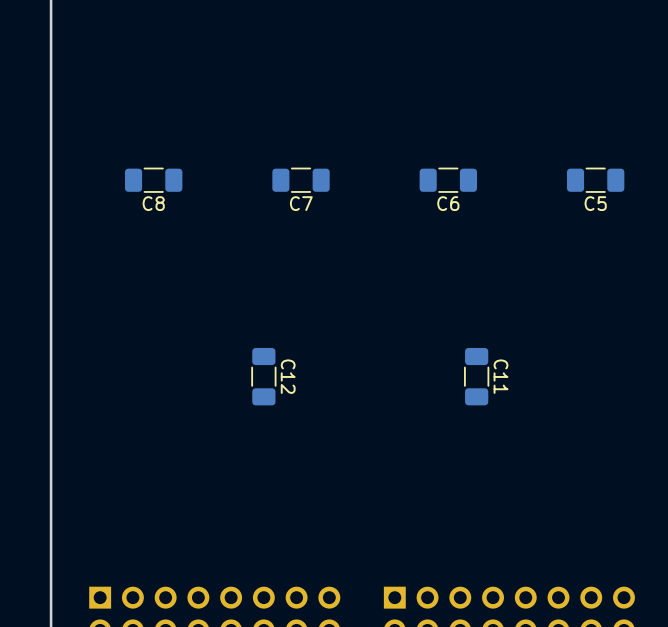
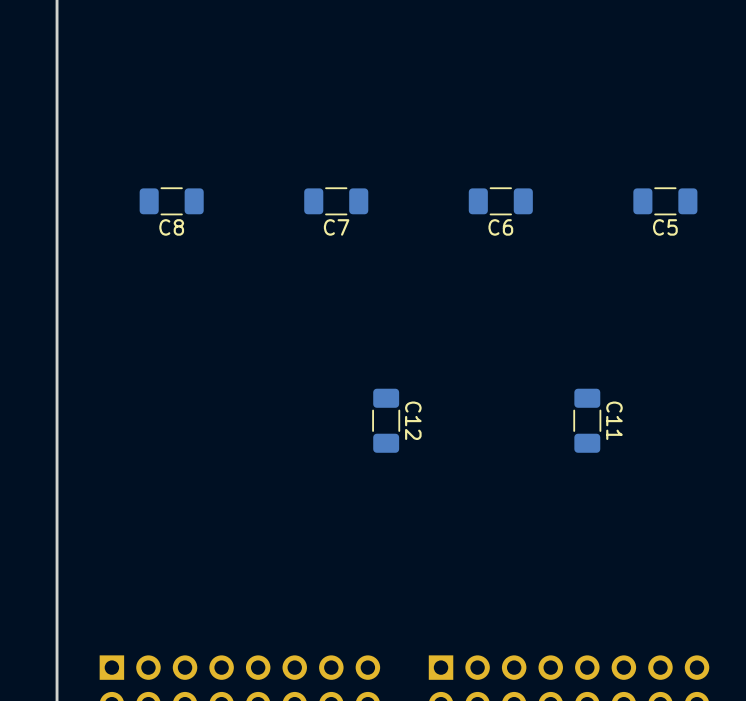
C12 position: (263, 376) -> (386, 420)
C11 position: (476, 376) -> (587, 420)

